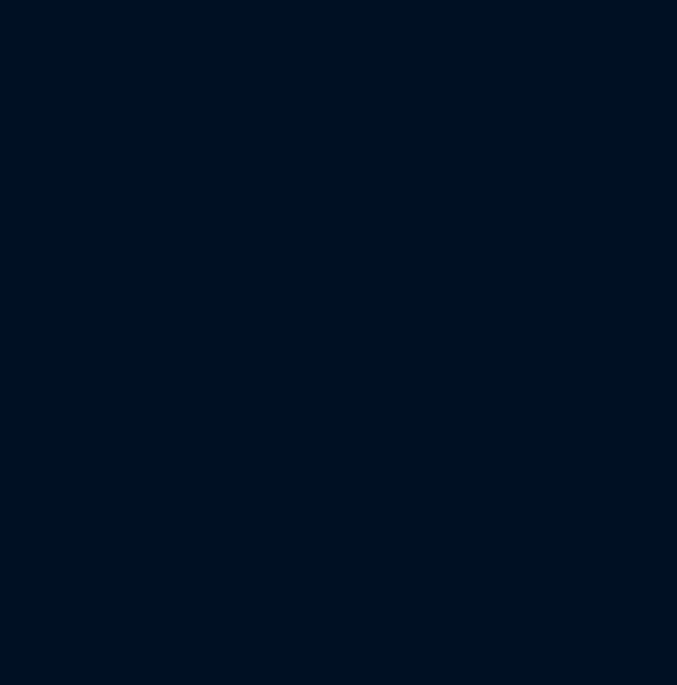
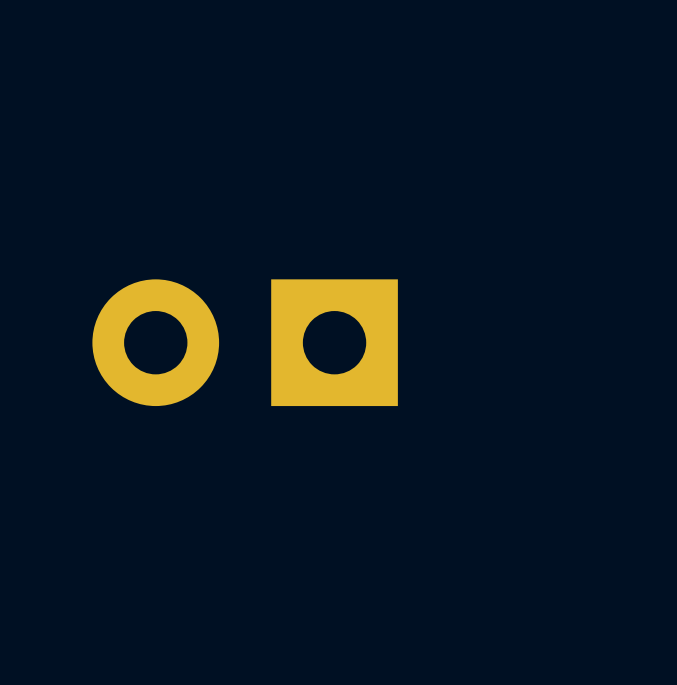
part: none -> (245, 342)

